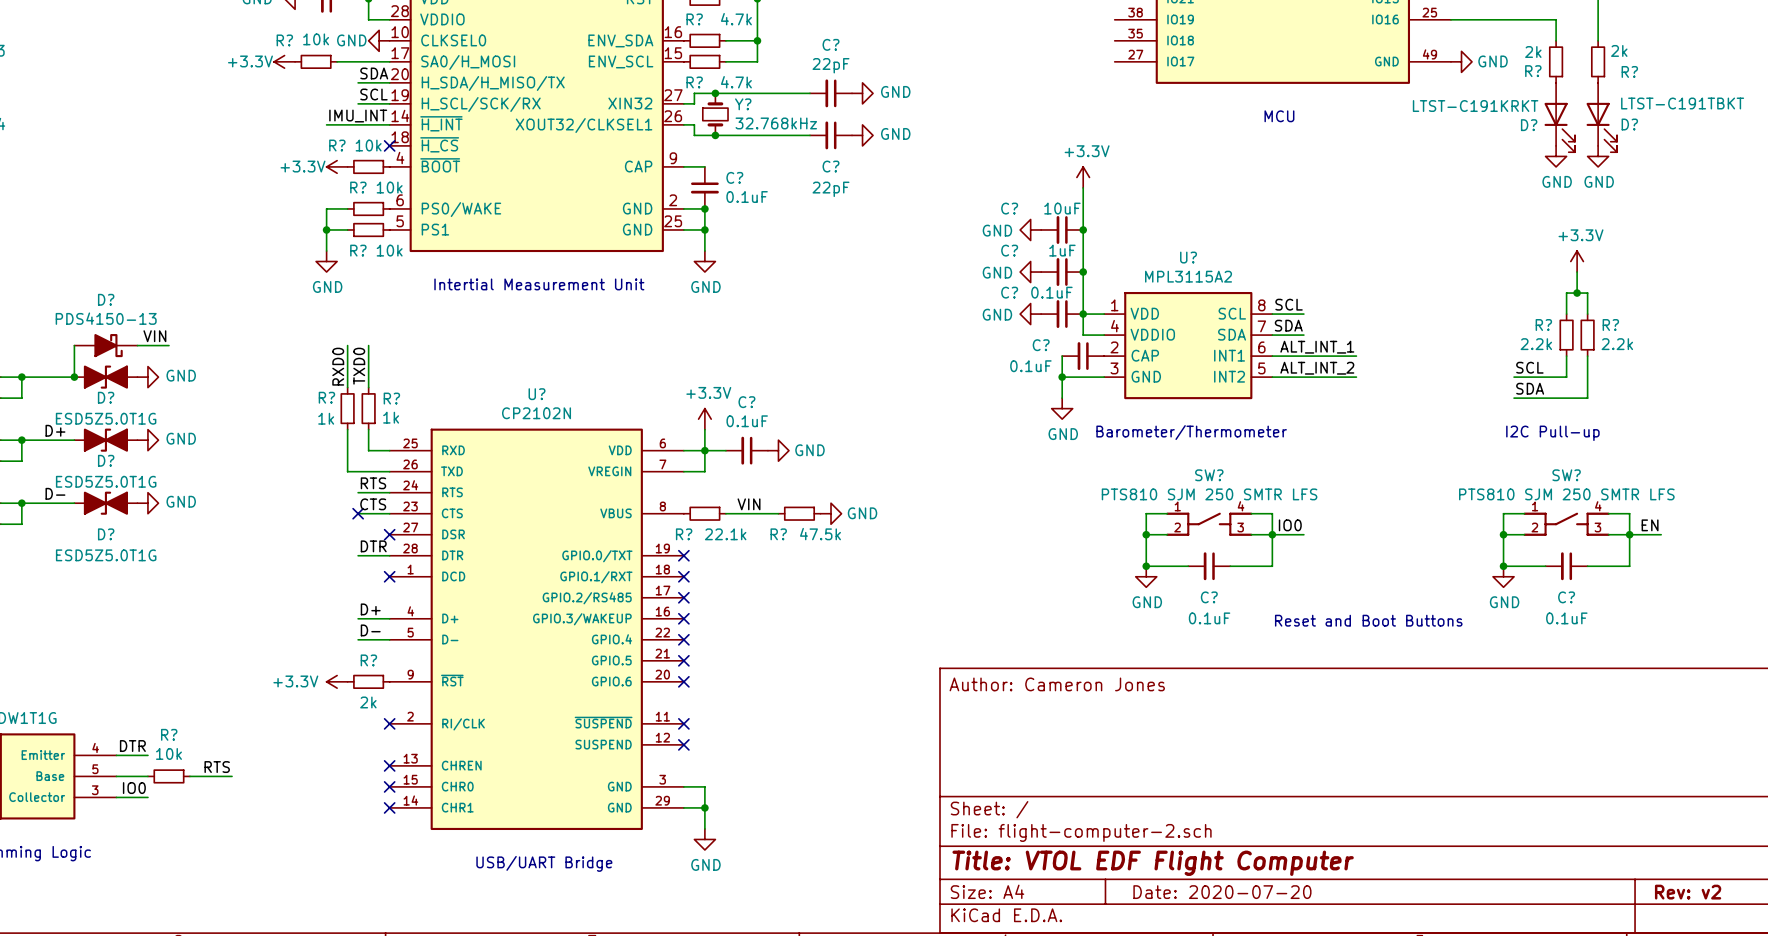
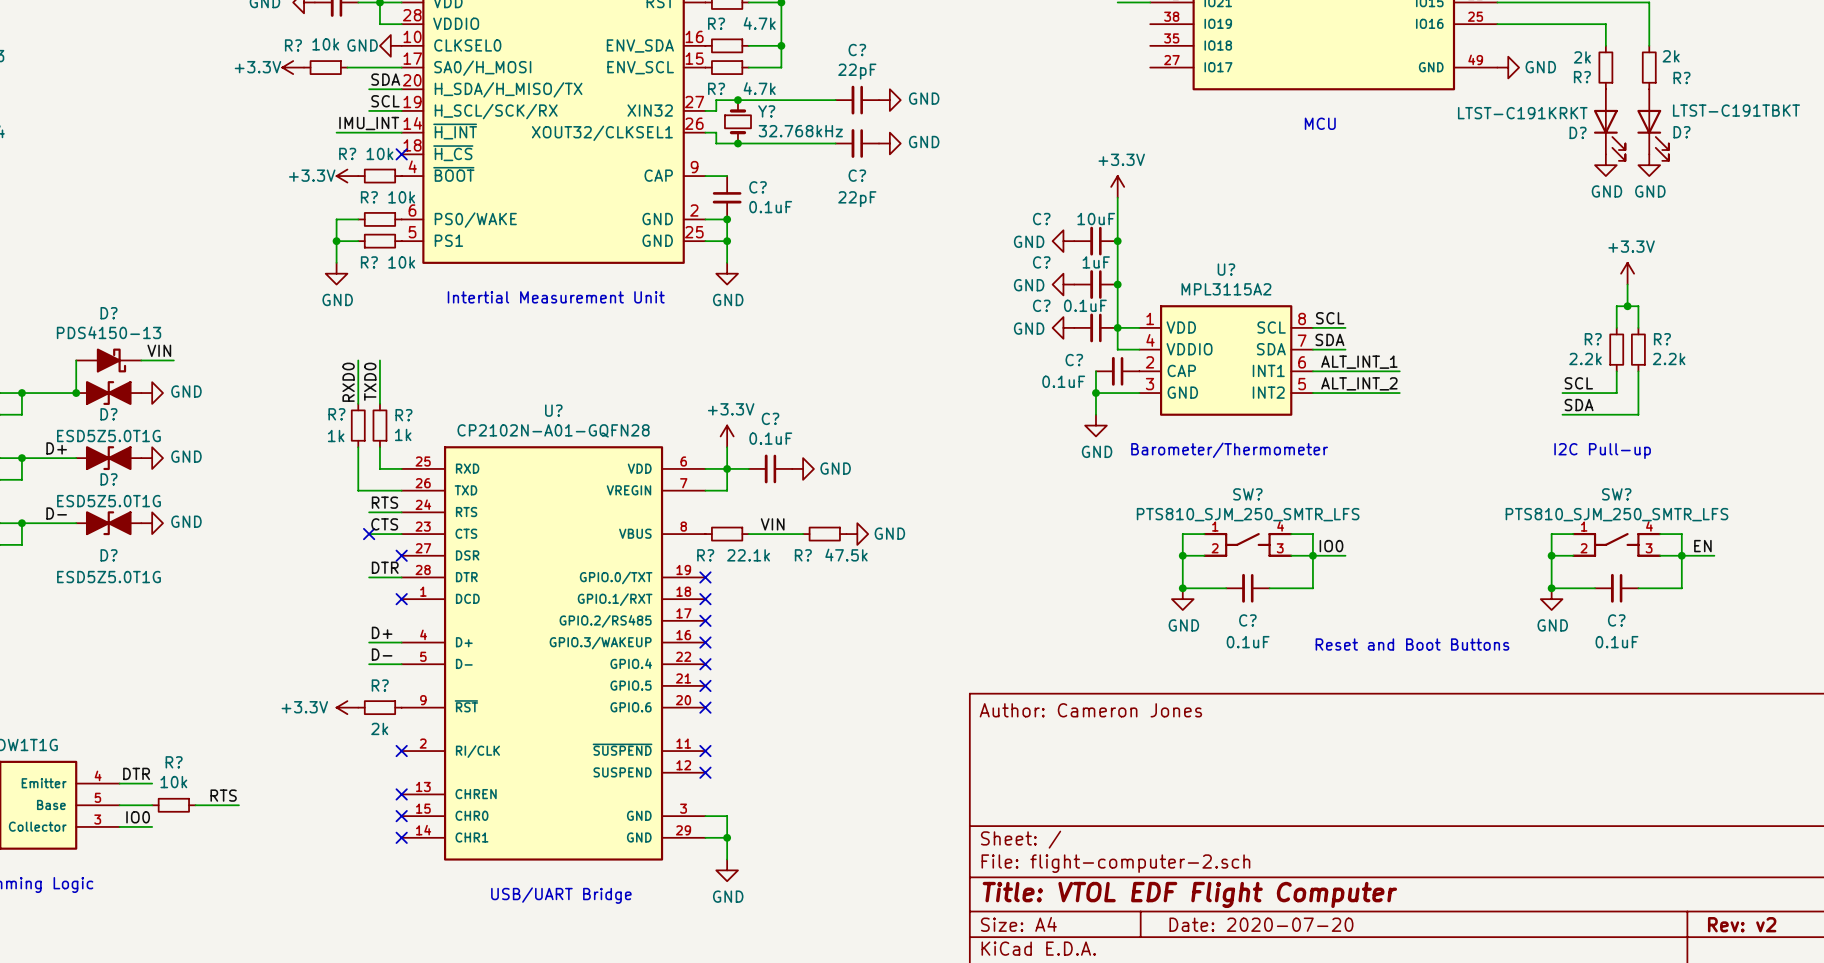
U? value: CP2102N (536, 413) -> CP2102N-A01-GQFN28 (553, 430)
SW? value: PTS810 SJM 250 SMTR LFS (1209, 494) -> PTS810_SJM_250_SMTR_LFS (1248, 514)
SW? value: PTS810 SJM 250 SMTR LFS (1566, 494) -> PTS810_SJM_250_SMTR_LFS (1616, 514)

